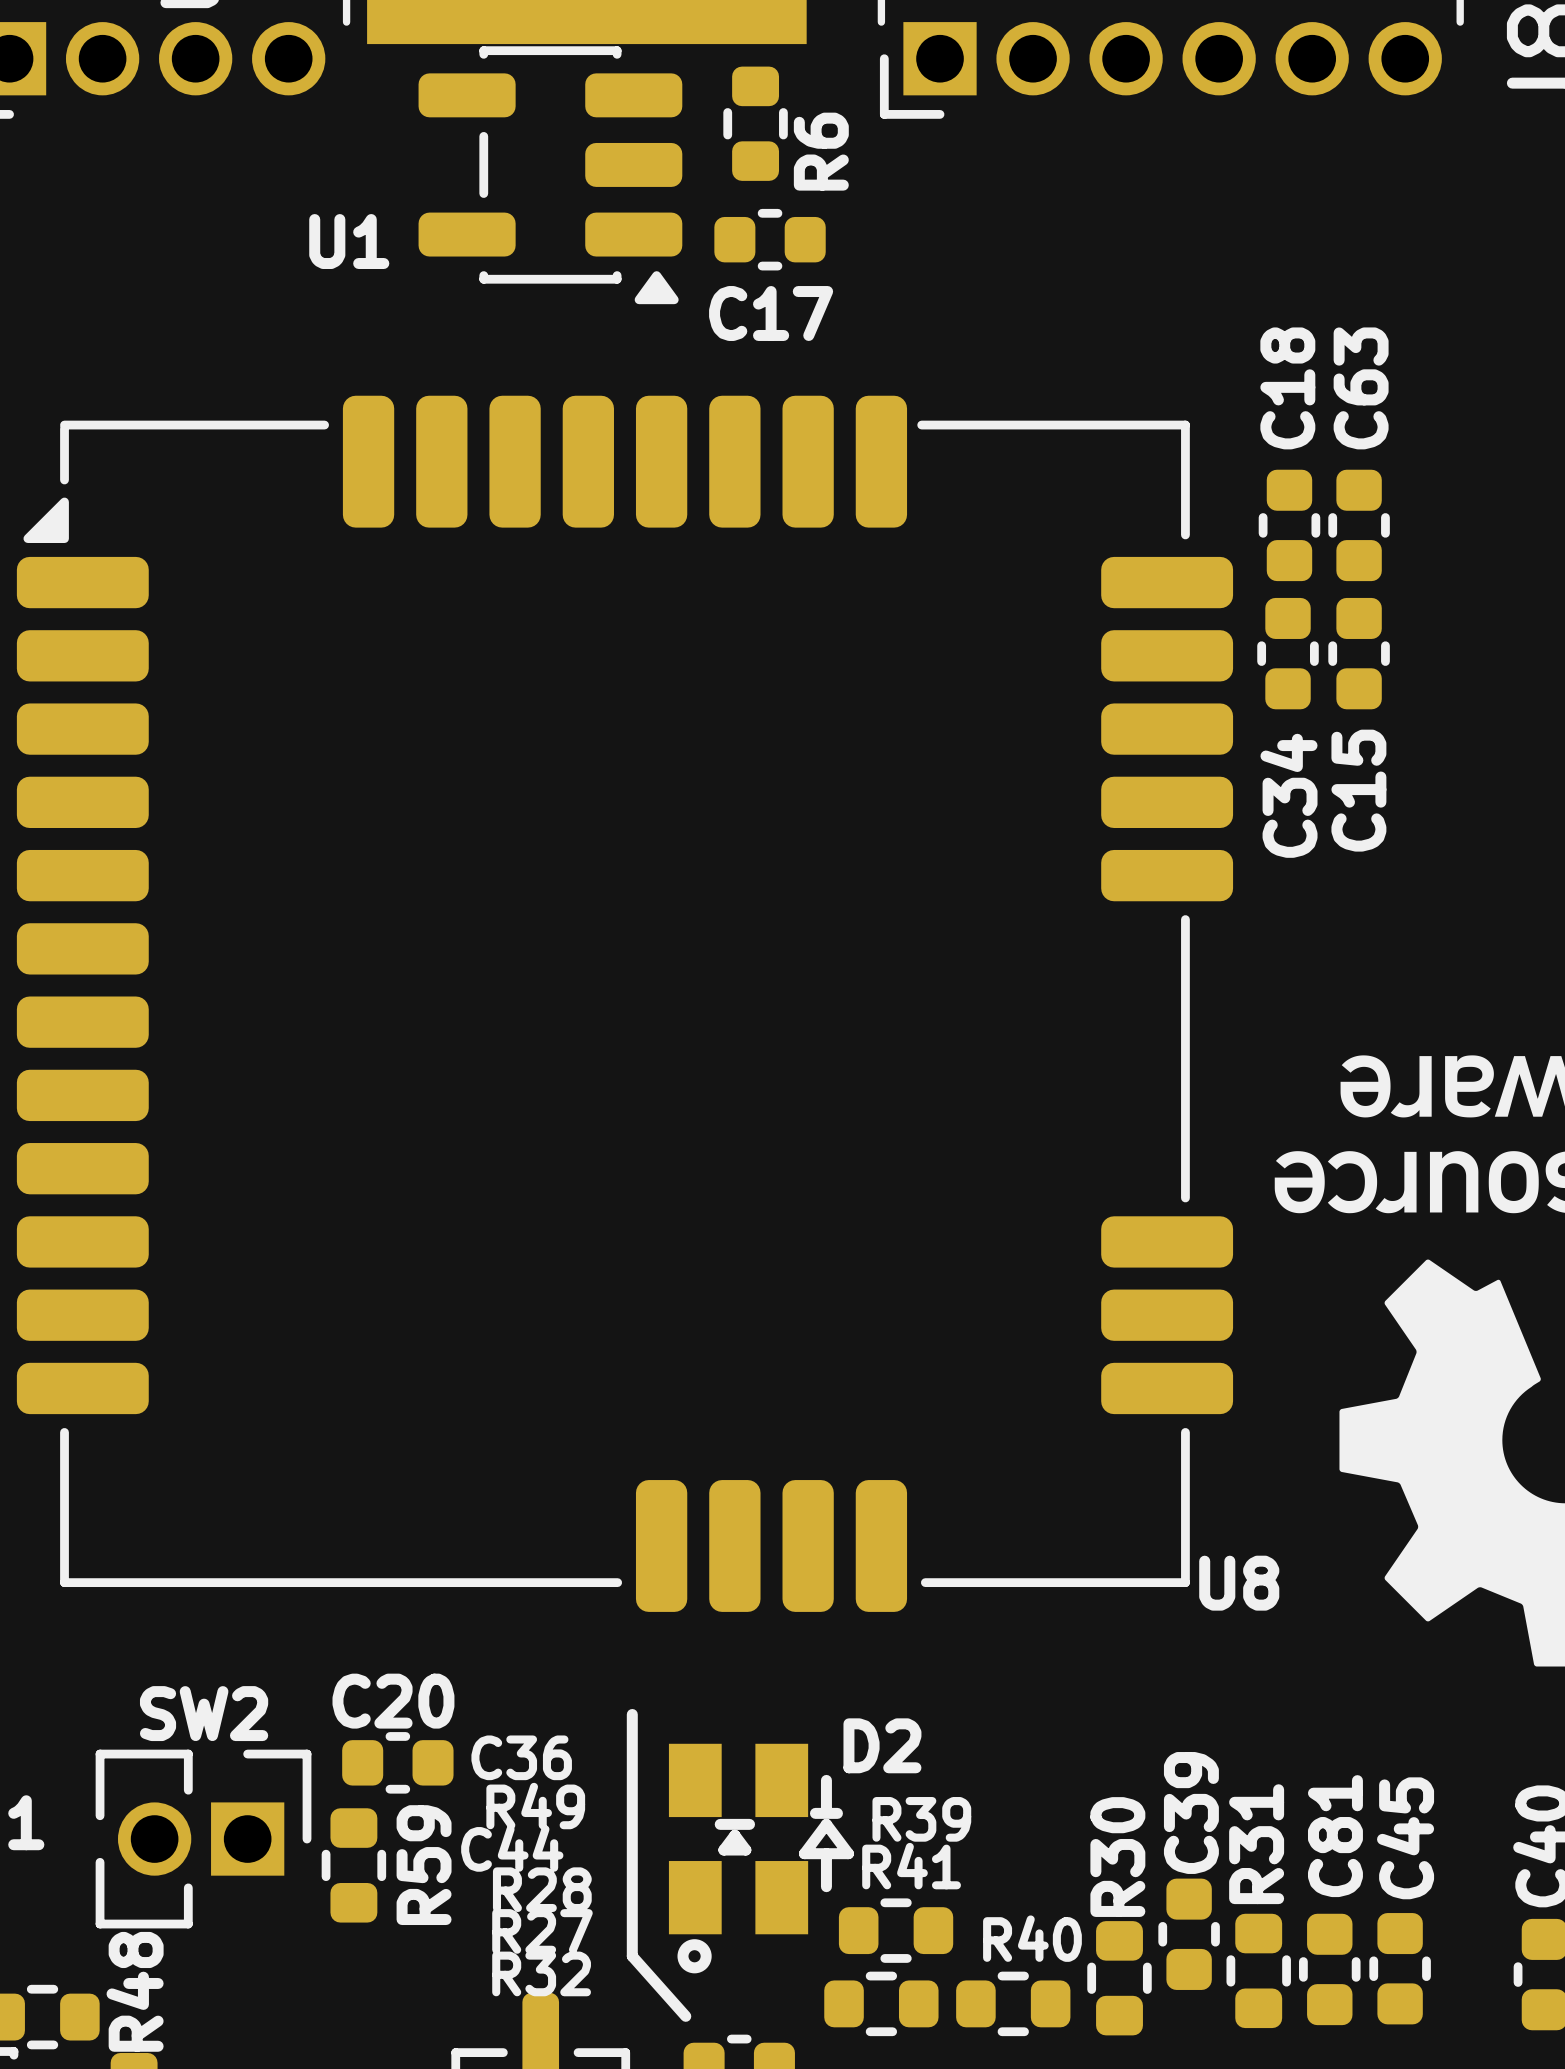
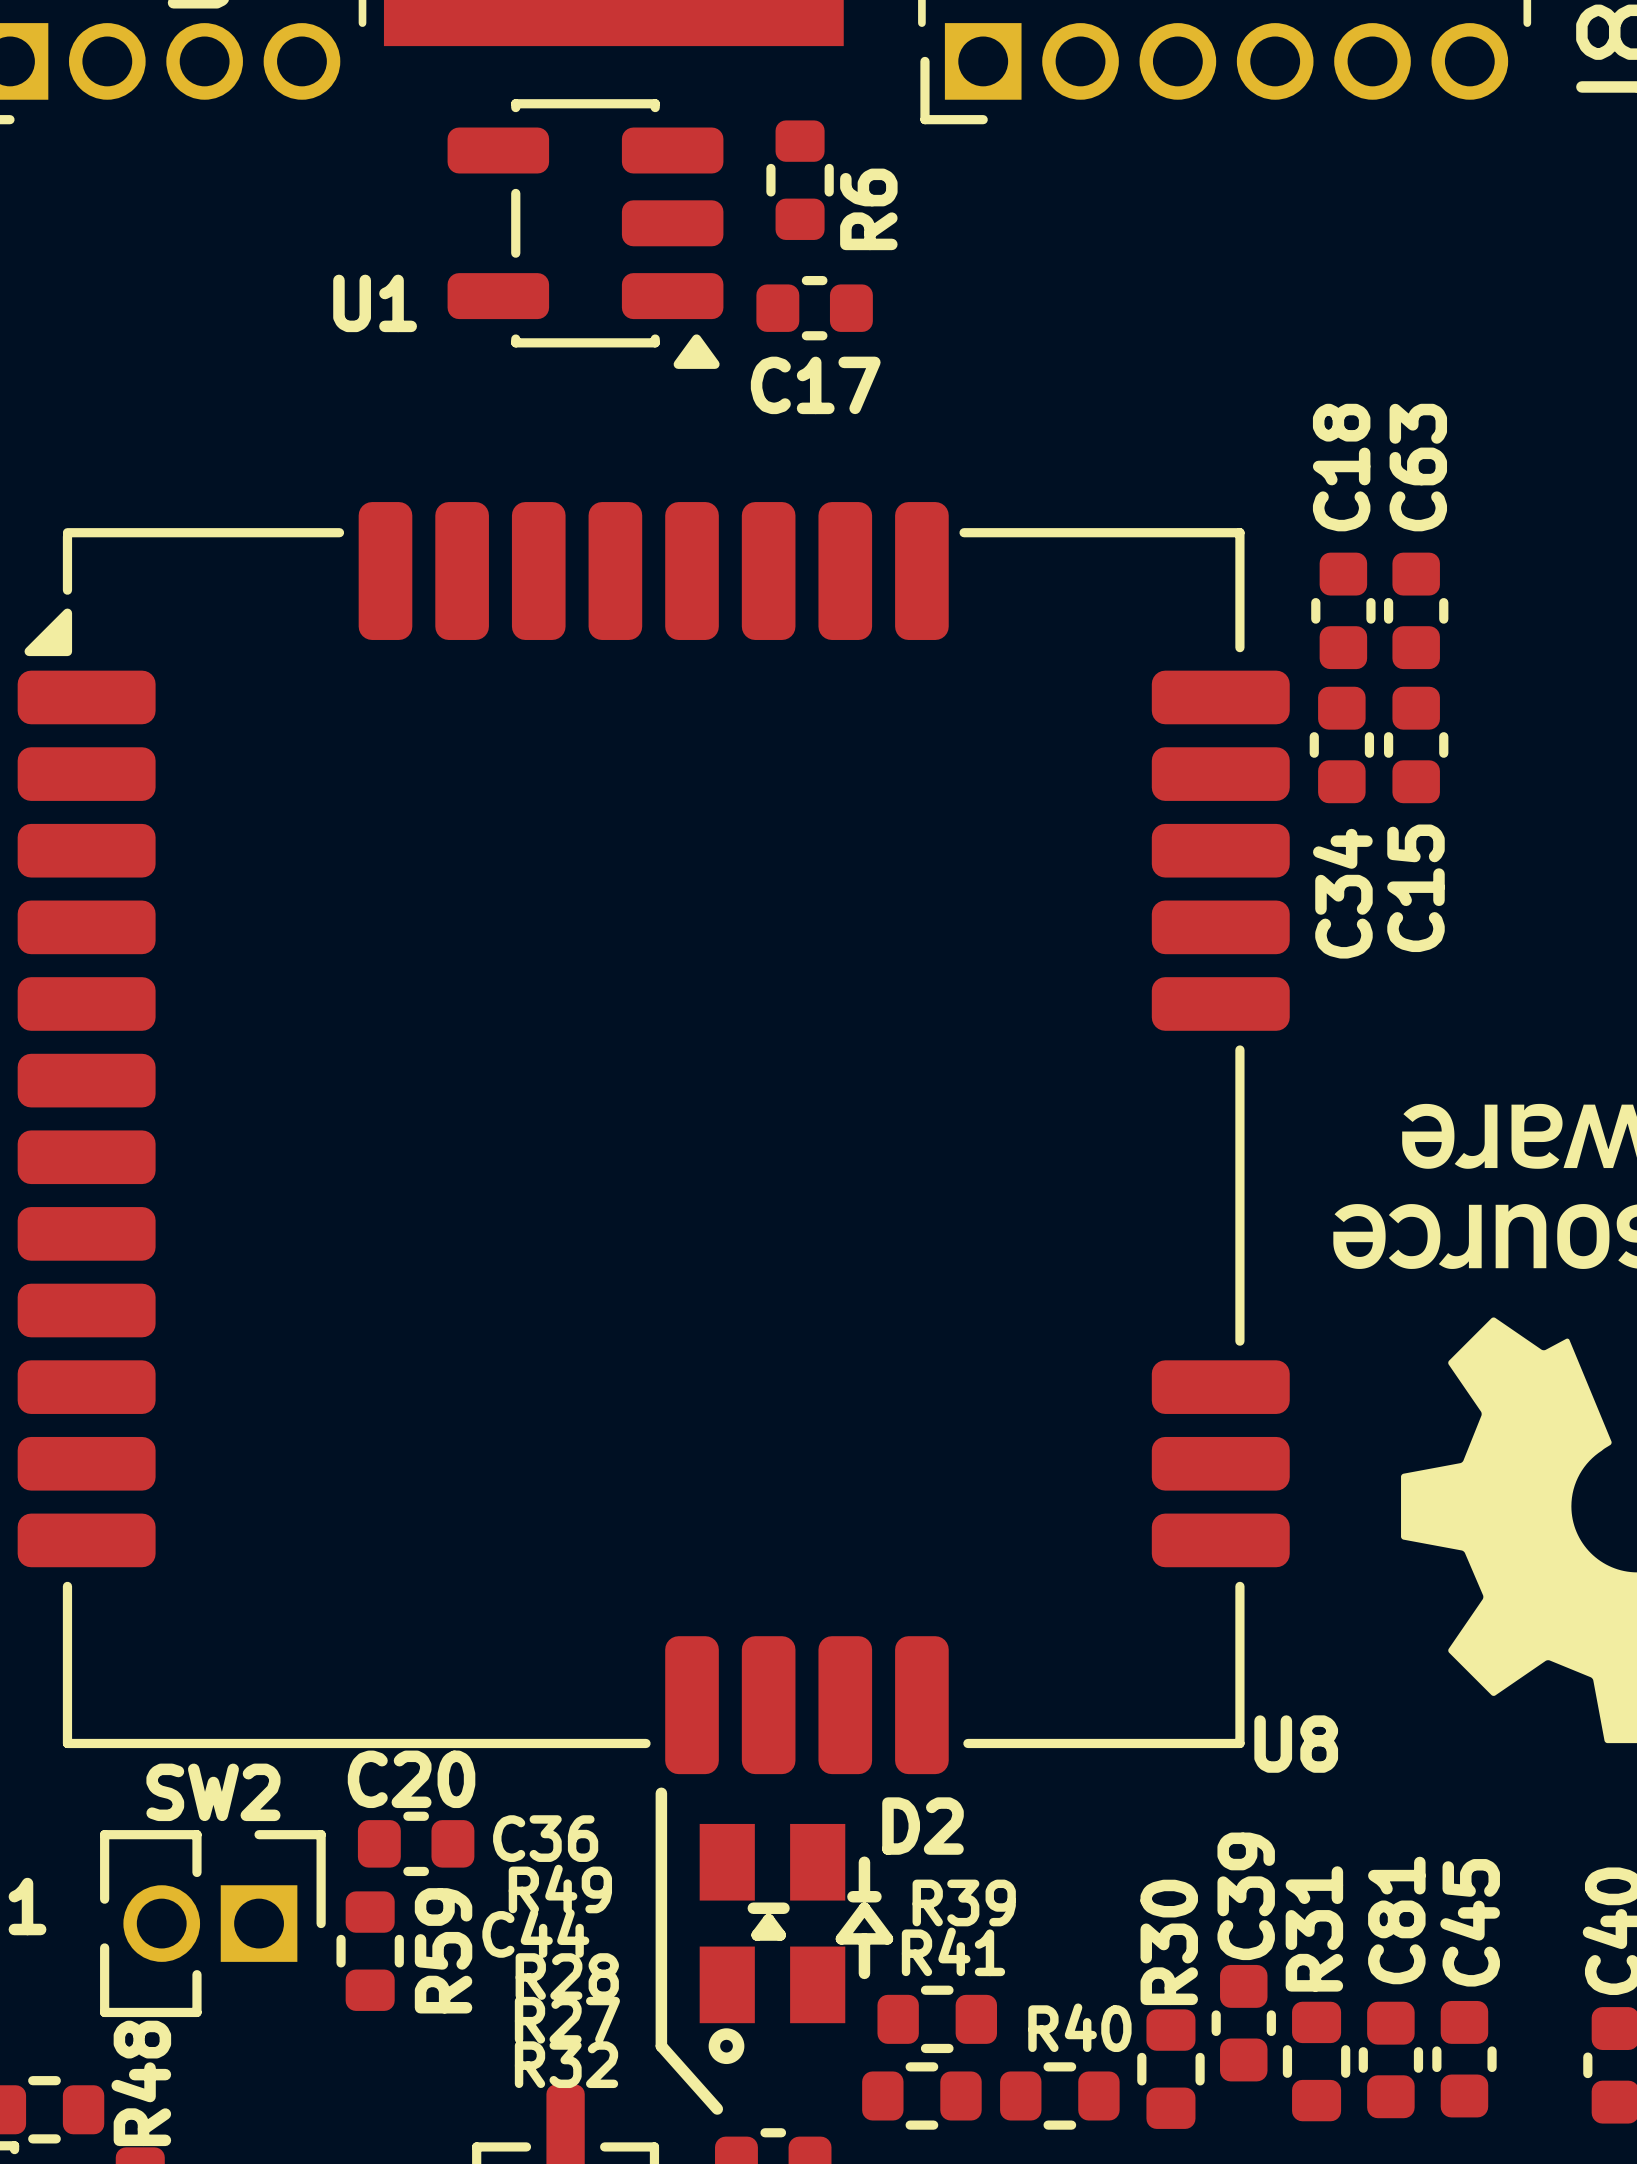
R6 position: (755, 123) -> (800, 180)
U1 position: (550, 175) -> (585, 234)
C17 position: (770, 239) -> (814, 308)
C18 position: (1289, 525) -> (1343, 610)
C63 position: (1359, 525) -> (1416, 610)
C34 position: (1288, 653) -> (1341, 744)
C15 position: (1359, 653) -> (1416, 744)
U8 position: (624, 1003) -> (653, 1138)

